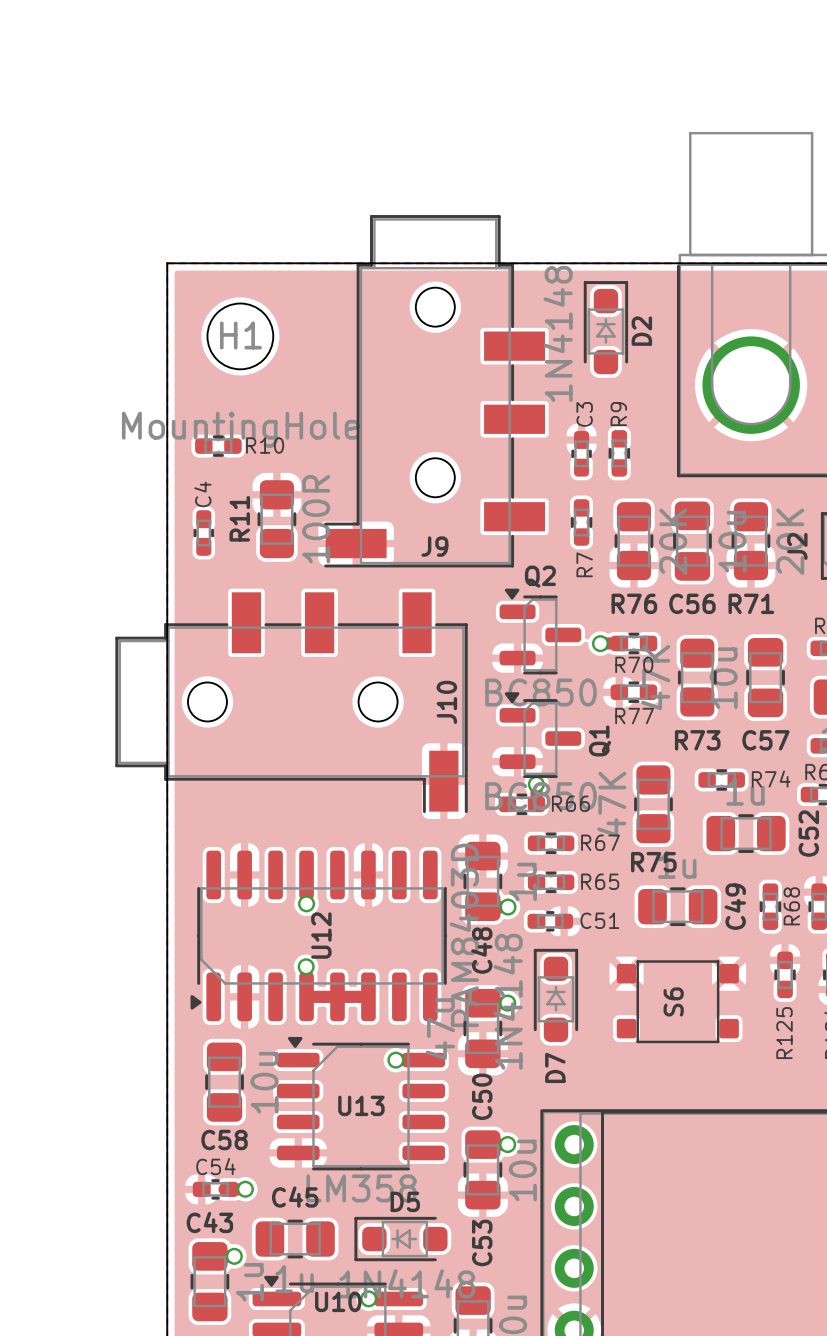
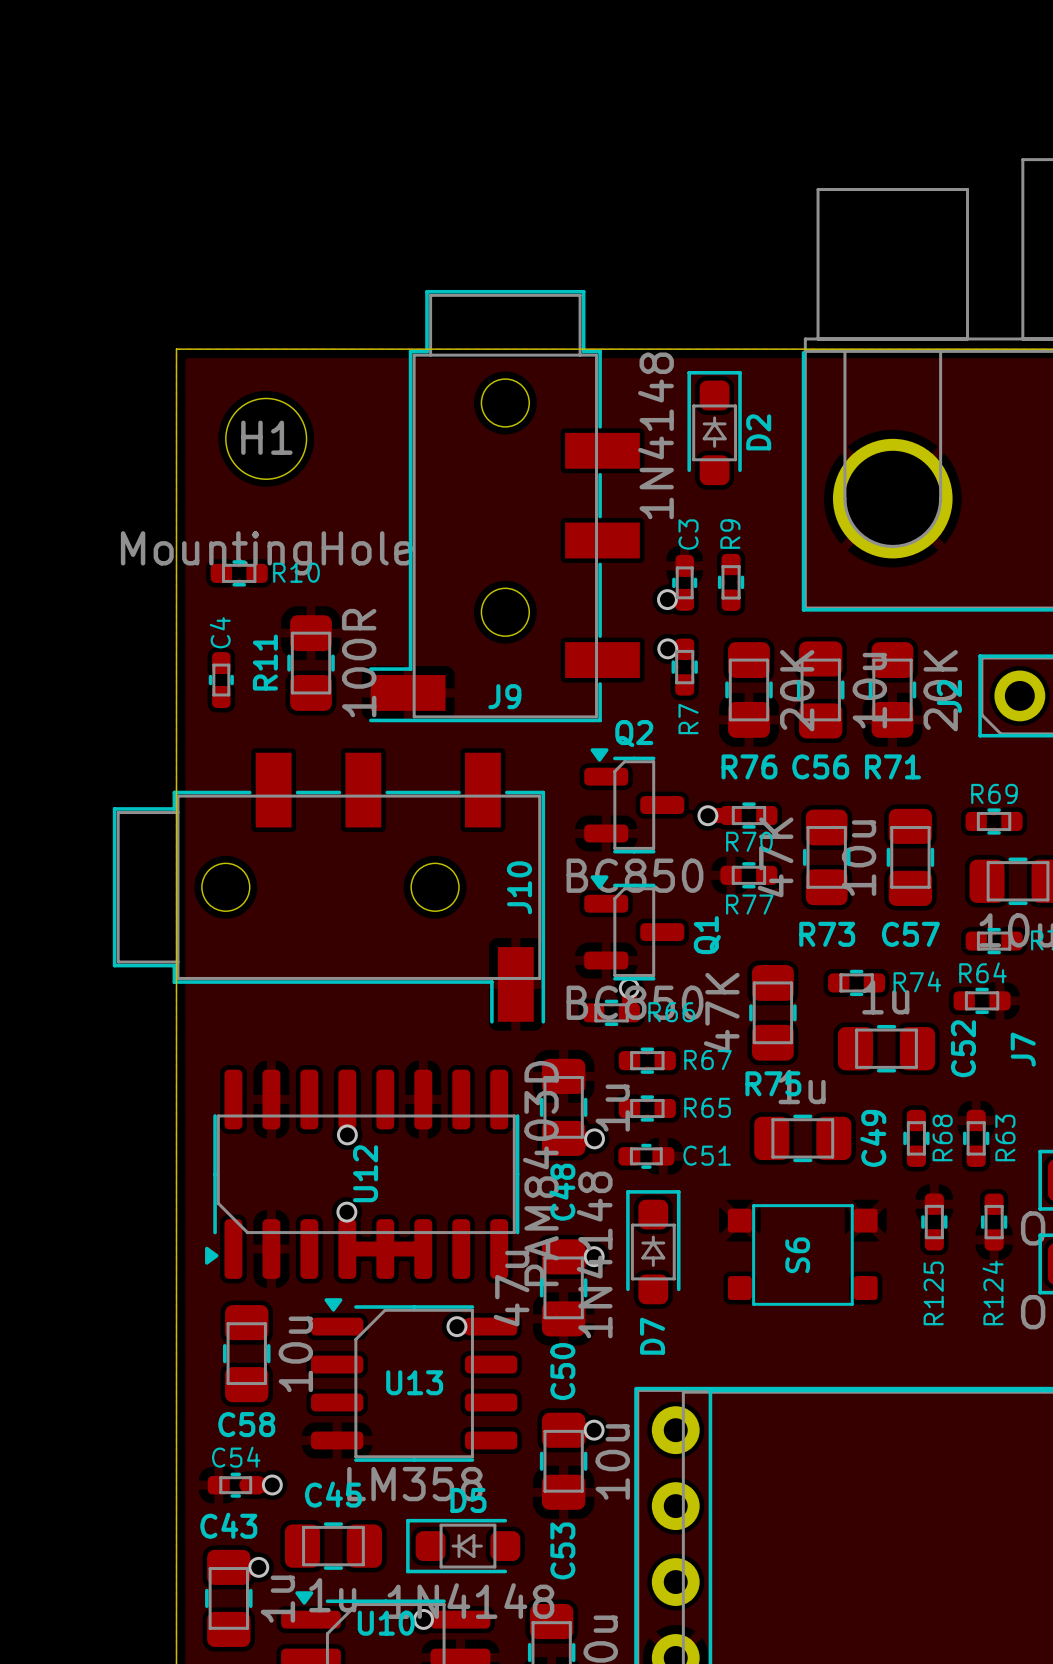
via: none -> (667, 599)
via: none -> (667, 648)

